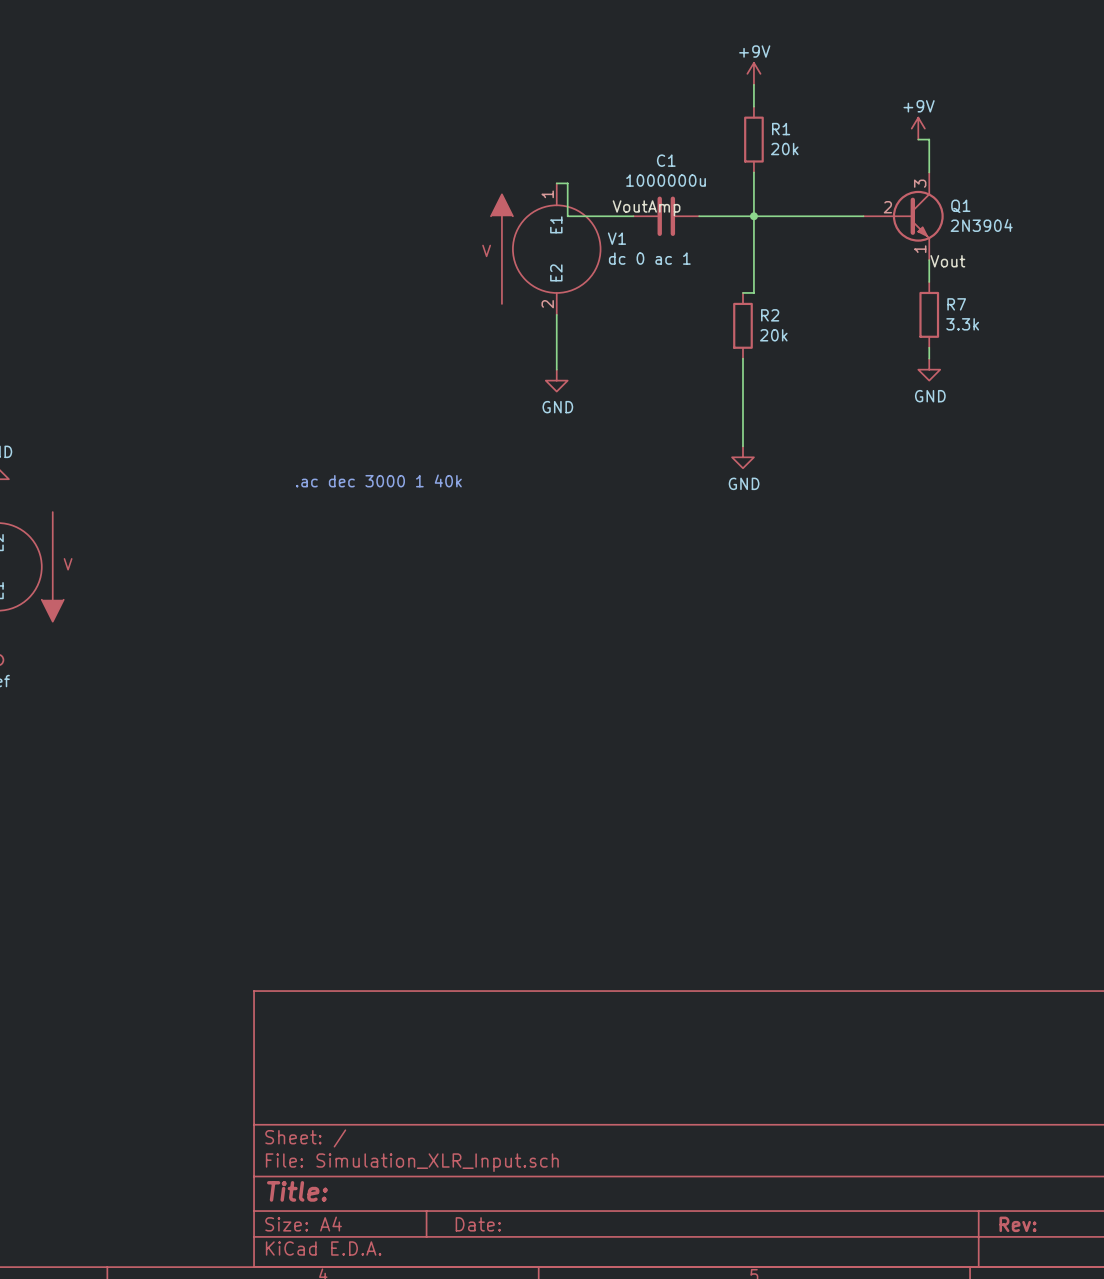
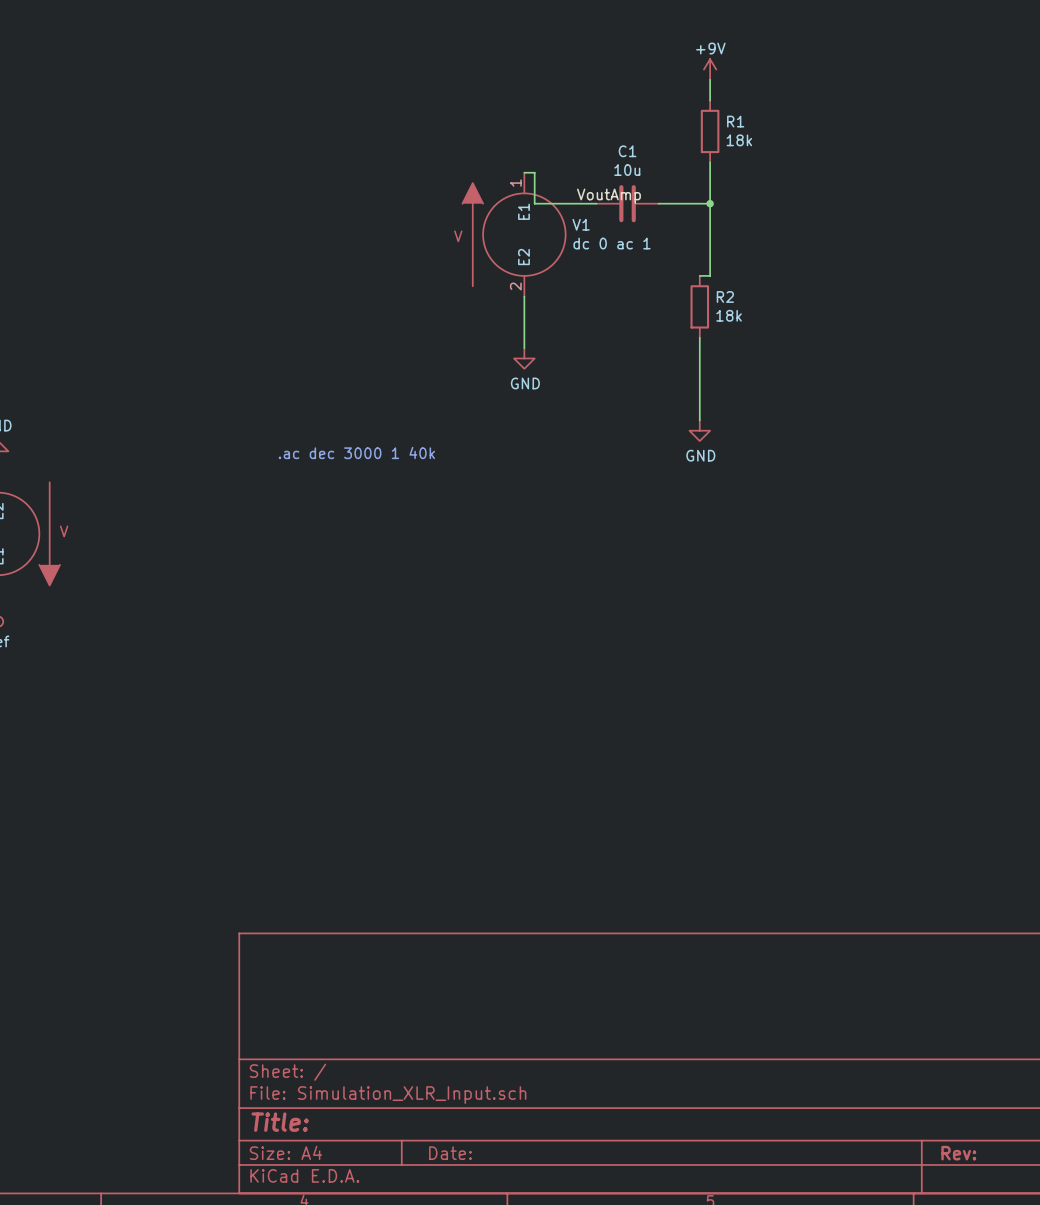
power symbol: +9V (918, 128) -> none
wire: (918, 139) (929, 139) (929, 172) -> none
R1 value: 20k (784, 149) -> 18k (739, 140)
C1 value: 1000000u (666, 180) -> 10u (627, 170)
wire: (753, 216) (863, 216) -> none
Q1: 2N3904 (903, 216) -> none
wire: (929, 260) (929, 282) -> none
label: Vout (947, 261) -> none
R7: 3.3k (929, 314) -> none
R2 value: 20k (773, 335) -> 18k (729, 315)
wire: (929, 347) (929, 358) -> none
power symbol: GND (929, 369) -> none

